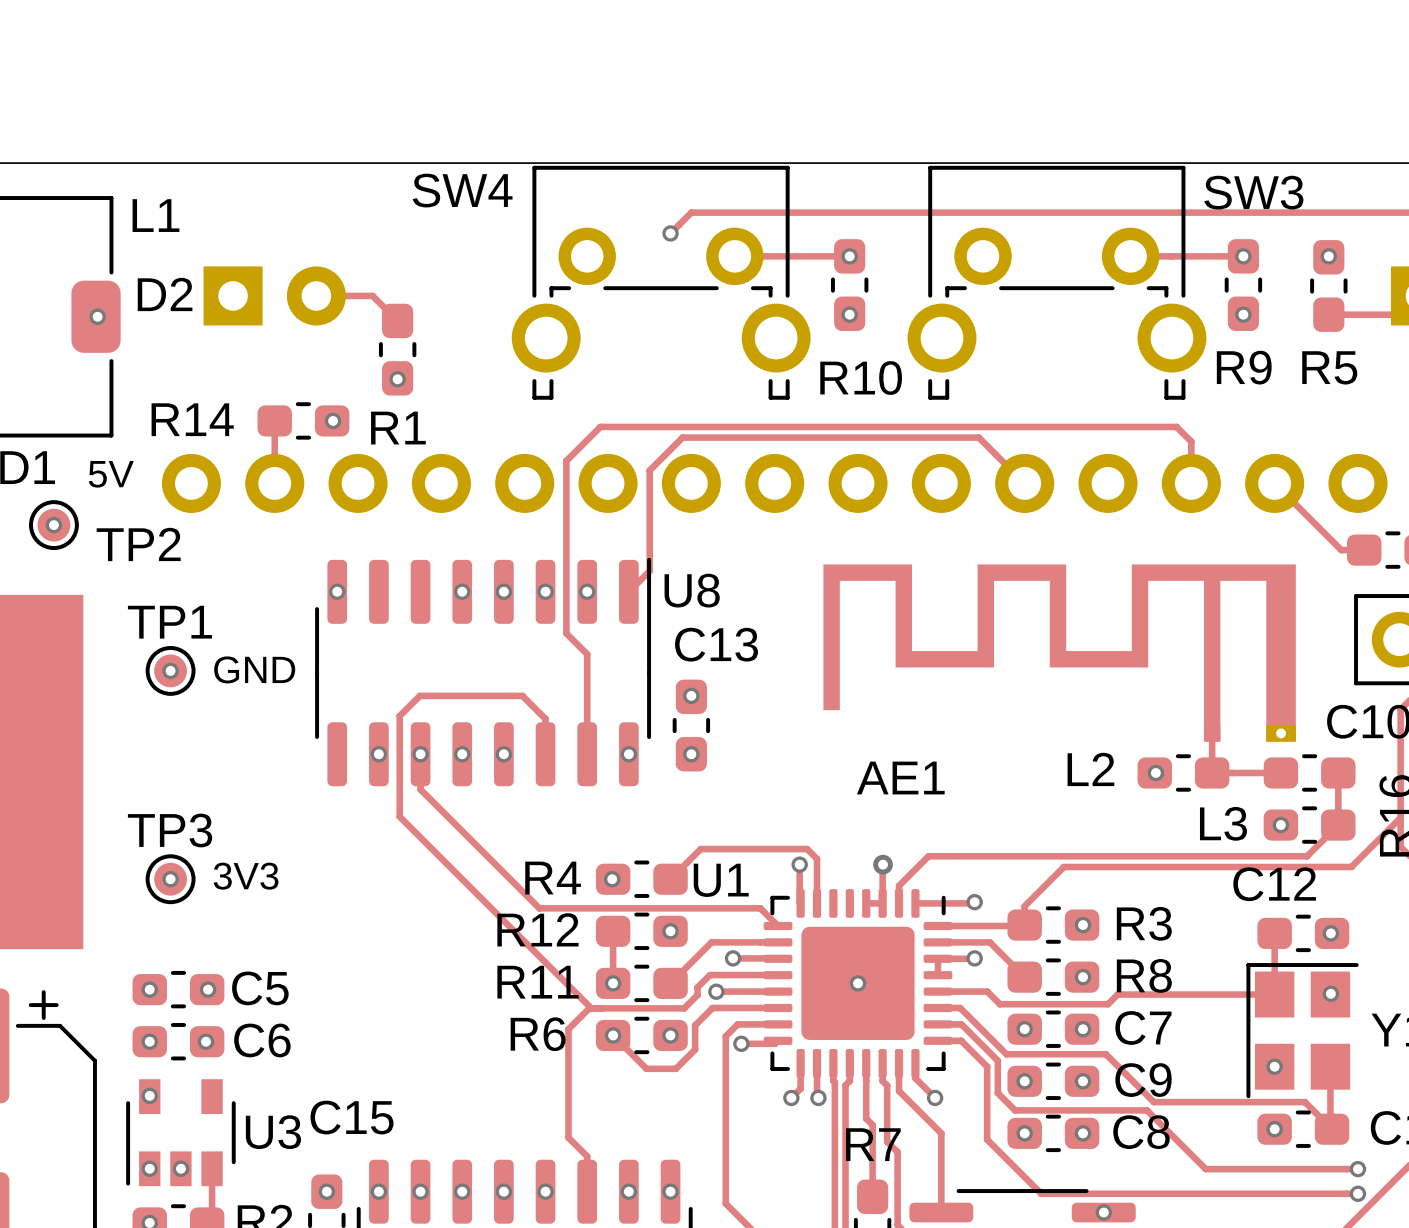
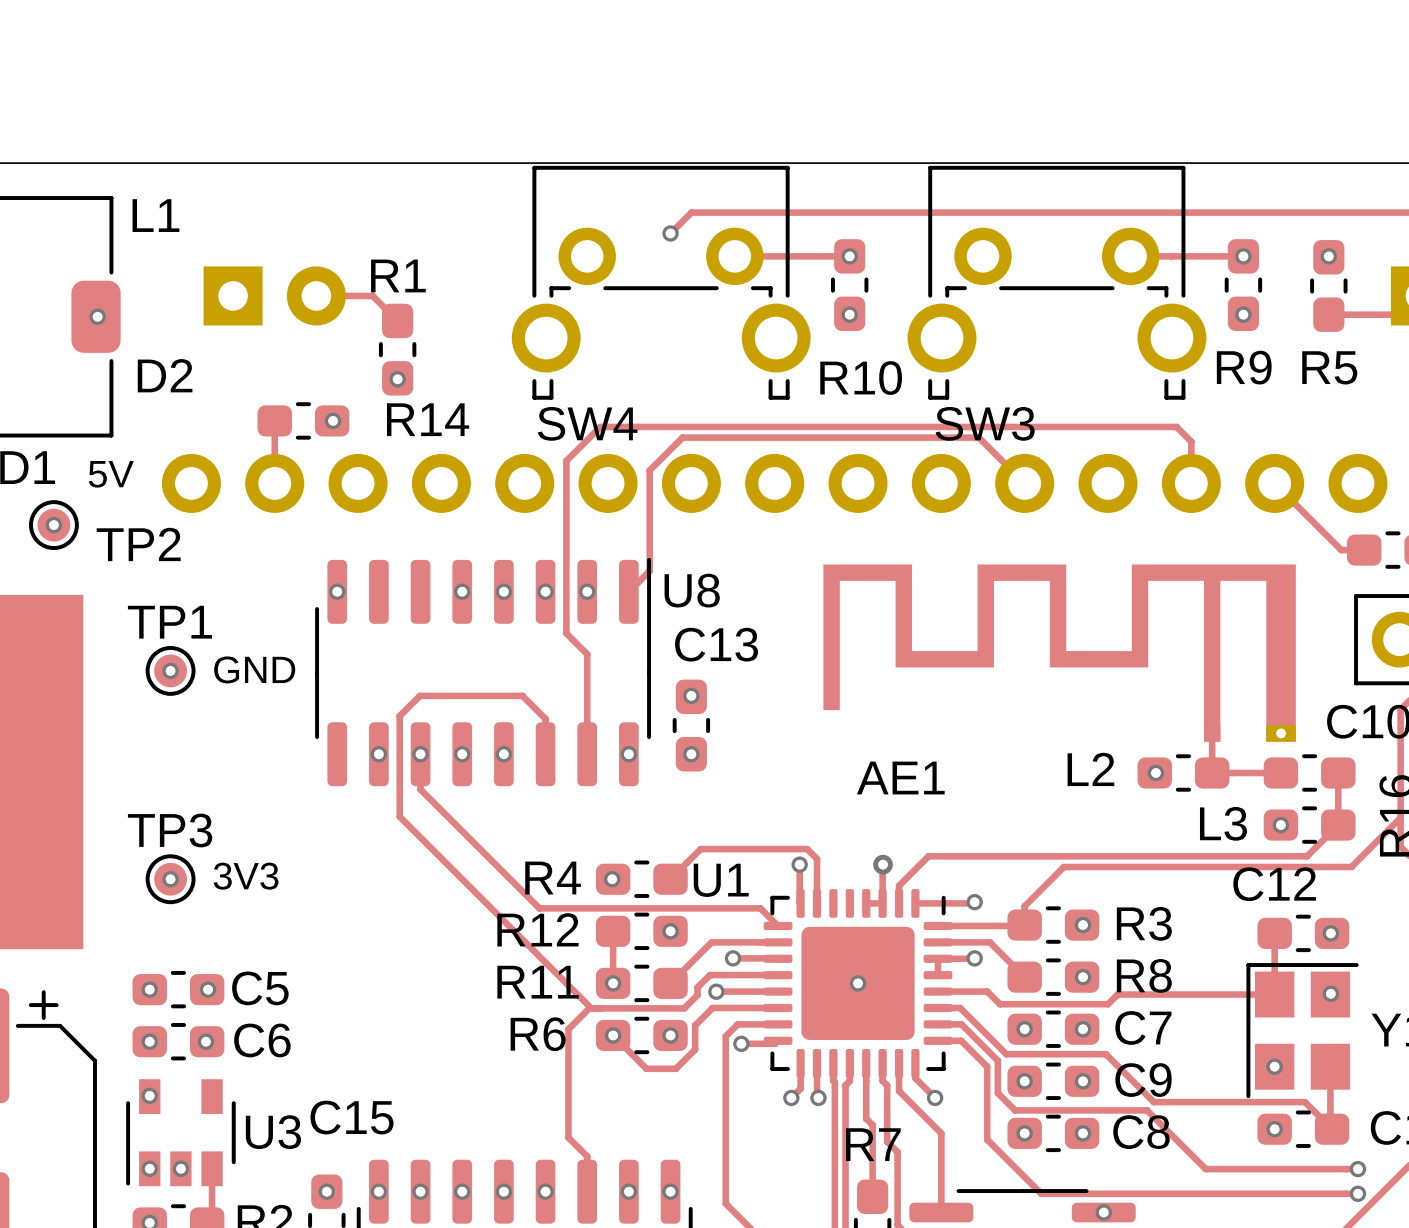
SW4 name position: SW4 (462, 190) -> SW4 (587, 423)
SW3 name position: SW3 (1253, 192) -> SW3 (985, 423)
D2 name position: D2 (165, 294) -> D2 (165, 375)
R14 name position: R14 (192, 419) -> R14 (428, 419)
R1 name position: R1 (398, 428) -> R1 (398, 275)

